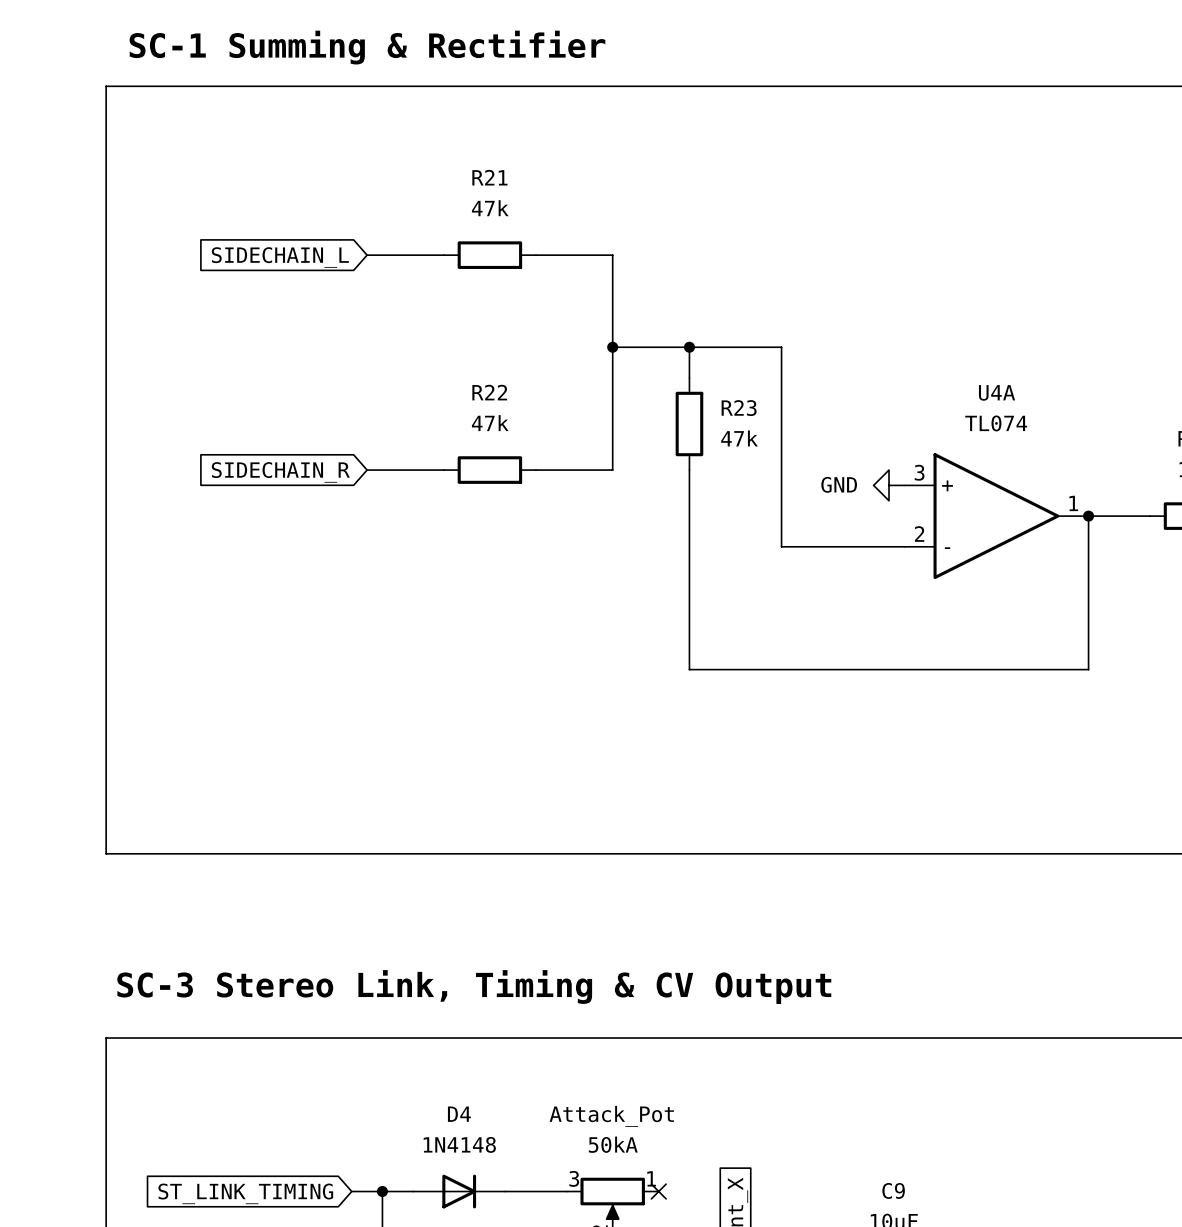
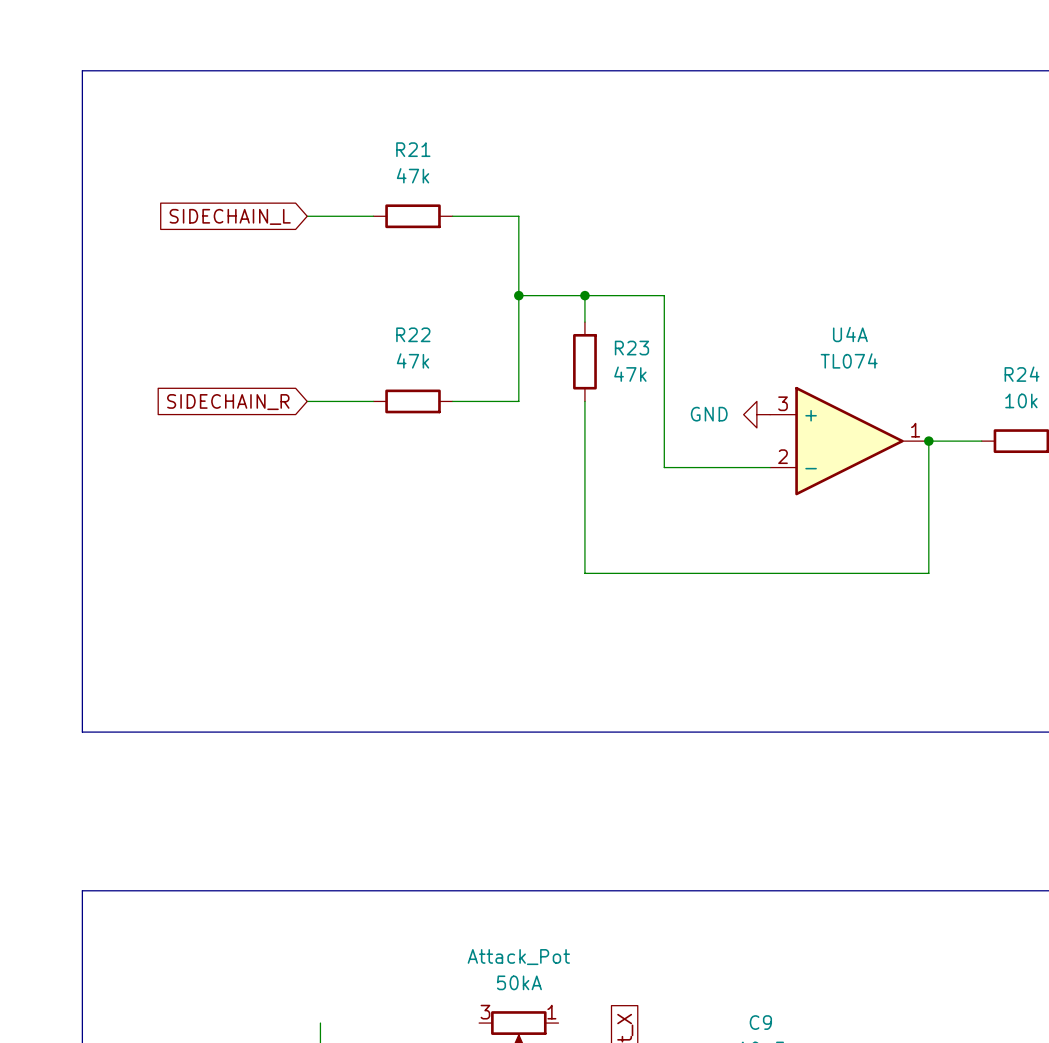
text: SC-1 Summing & Rectifier (367, 47) -> none
text: SC-3 Stereo Link, Timing & CV Output (474, 987) -> none
wire: (351, 1191) (413, 1191) -> none
junction: (382, 1191) -> none
D4: 1N4148 (459, 1191) -> none
wire: (505, 1191) (566, 1191) -> none
no-connect mark: (658, 1191) -> none
global label: ST_LINK_TIMING (245, 1193) -> none

